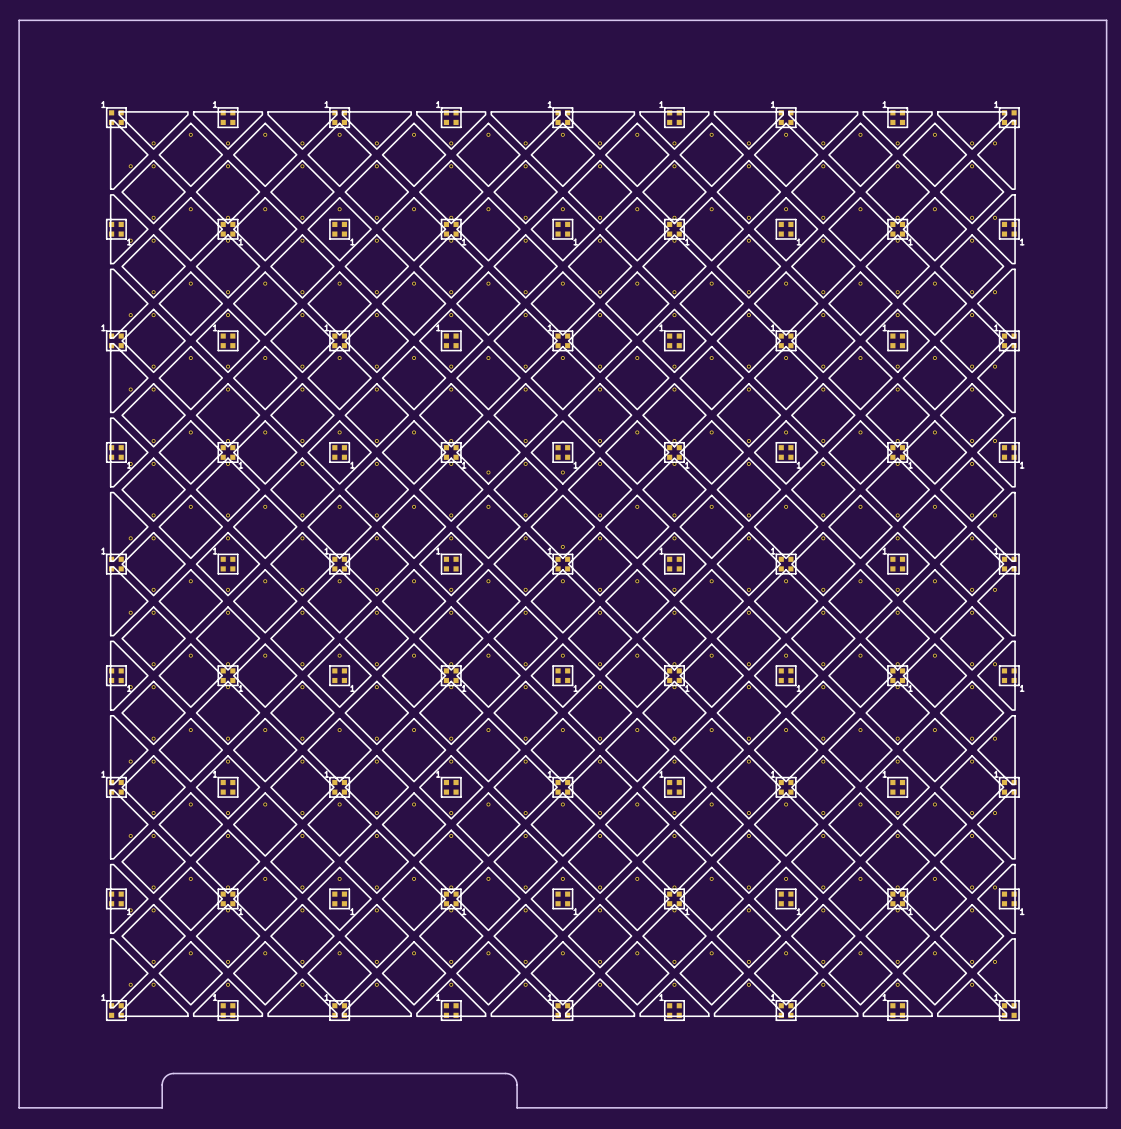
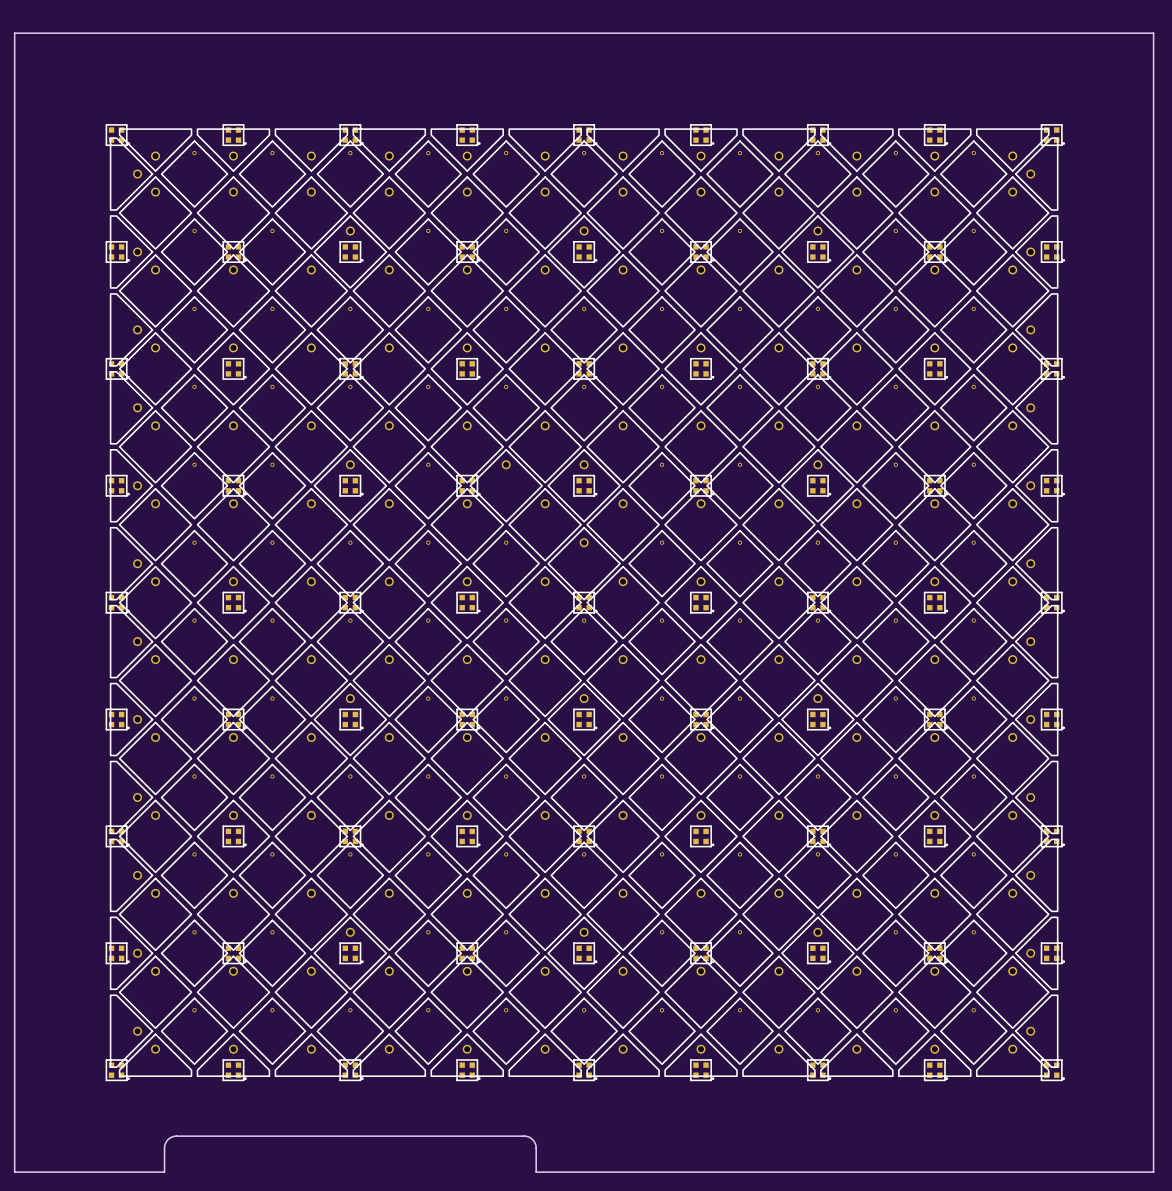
part footprint: [106, 107, 127, 128] -> [105, 124, 130, 146]
part footprint: [217, 107, 239, 128] -> [222, 124, 247, 146]
part footprint: [329, 107, 350, 128] -> [339, 124, 364, 146]
part footprint: [440, 107, 462, 128] -> [456, 124, 481, 146]
part footprint: [552, 107, 574, 128] -> [573, 124, 598, 146]
part footprint: [664, 107, 685, 128] -> [690, 124, 715, 146]
part footprint: [775, 107, 797, 128] -> [807, 124, 832, 146]
part footprint: [887, 107, 909, 128] -> [924, 124, 948, 146]
part footprint: [999, 107, 1020, 128] -> [1040, 124, 1065, 146]
part footprint: [118, 111, 189, 1017] -> [119, 566, 192, 639]
part footprint: [267, 111, 338, 1017] -> [275, 566, 348, 639]
part footprint: [342, 111, 412, 1017] -> [353, 566, 426, 639]
part footprint: [491, 111, 561, 1017] -> [508, 566, 582, 639]
part footprint: [565, 111, 635, 1017] -> [586, 566, 660, 639]
part footprint: [714, 111, 784, 1017] -> [742, 566, 816, 639]
part footprint: [788, 111, 858, 1017] -> [820, 566, 894, 639]
part footprint: [937, 111, 1007, 1017] -> [976, 566, 1049, 639]
part footprint: [110, 120, 149, 190] -> [109, 137, 154, 211]
part footprint: [977, 120, 1016, 190] -> [1015, 137, 1059, 211]
part: none -> (155, 150)
part: none -> (233, 150)
part: none -> (311, 150)
part: none -> (389, 150)
part: none -> (467, 150)
part: none -> (545, 150)
part: none -> (623, 150)
part: none -> (701, 150)
part: none -> (778, 150)
part: none -> (856, 150)
part: none -> (934, 150)
part: none -> (1012, 150)
part: none -> (155, 213)
part: none -> (233, 213)
part: none -> (311, 213)
part: none -> (389, 213)
part: none -> (467, 213)
part: none -> (545, 213)
part: none -> (623, 213)
part: none -> (701, 213)
part: none -> (778, 213)
part: none -> (856, 213)
part: none -> (934, 213)
part: none -> (1012, 213)
part footprint: [110, 194, 149, 264] -> [109, 215, 154, 289]
part footprint: [977, 194, 1016, 264] -> [1015, 215, 1059, 289]
part footprint: [106, 218, 127, 240] -> [105, 241, 130, 263]
part footprint: [217, 218, 239, 240] -> [222, 241, 247, 263]
part footprint: [440, 218, 462, 240] -> [456, 241, 481, 263]
part footprint: [664, 218, 685, 240] -> [690, 241, 715, 263]
part footprint: [887, 218, 909, 240] -> [924, 241, 948, 263]
part footprint: [999, 218, 1020, 240] -> [1040, 241, 1065, 263]
part: (339, 229) -> none
part: (339, 229) -> none
part: none -> (350, 251)
part: none -> (351, 251)
part: (562, 229) -> none
part: (562, 229) -> none
part: none -> (584, 251)
part: none -> (585, 251)
part: (786, 229) -> none
part: (786, 229) -> none
part: none -> (817, 251)
part: none -> (819, 251)
part: none -> (155, 290)
part: none -> (233, 290)
part: none -> (311, 290)
part: none -> (389, 290)
part: none -> (467, 290)
part: none -> (545, 290)
part: none -> (623, 290)
part: none -> (701, 290)
part: none -> (778, 290)
part: none -> (856, 290)
part: none -> (934, 290)
part: none -> (1012, 290)
part footprint: [110, 269, 149, 339] -> [109, 293, 154, 367]
part footprint: [977, 269, 1016, 339] -> [1015, 293, 1059, 367]
part footprint: [106, 330, 127, 352] -> [105, 358, 130, 380]
part footprint: [217, 330, 239, 352] -> [197, 332, 270, 406]
part footprint: [329, 330, 350, 352] -> [339, 358, 364, 380]
part footprint: [440, 330, 462, 352] -> [430, 332, 504, 406]
part footprint: [552, 330, 574, 352] -> [573, 358, 598, 380]
part footprint: [664, 330, 685, 352] -> [664, 332, 738, 406]
part footprint: [775, 330, 797, 352] -> [807, 358, 832, 380]
part footprint: [887, 330, 909, 352] -> [898, 332, 972, 406]
part footprint: [999, 330, 1020, 352] -> [1040, 358, 1065, 380]
part: none -> (155, 368)
part: none -> (234, 368)
part: none -> (311, 368)
part: none -> (389, 368)
part: none -> (468, 368)
part: none -> (545, 368)
part: none -> (623, 368)
part: none -> (702, 368)
part: none -> (778, 368)
part: none -> (856, 368)
part: none -> (936, 368)
part: none -> (1012, 368)
part footprint: [110, 343, 149, 413] -> [109, 371, 154, 445]
part footprint: [977, 343, 1016, 413] -> [1015, 371, 1059, 445]
part: none -> (155, 446)
part: none -> (233, 446)
part: none -> (311, 446)
part: none -> (389, 446)
part: none -> (467, 446)
part: none -> (545, 446)
part: none -> (623, 446)
part: none -> (701, 446)
part: none -> (778, 446)
part: none -> (856, 446)
part: none -> (934, 446)
part: none -> (1012, 446)
part footprint: [110, 417, 149, 488] -> [109, 449, 154, 523]
part footprint: [977, 417, 1016, 488] -> [1015, 449, 1059, 523]
part footprint: [456, 420, 521, 485] -> [469, 449, 543, 523]
part footprint: [106, 442, 127, 463] -> [105, 474, 130, 497]
part footprint: [217, 442, 239, 463] -> [222, 474, 247, 497]
part footprint: [440, 442, 462, 463] -> [456, 474, 481, 497]
part footprint: [664, 442, 685, 463] -> [690, 474, 715, 497]
part footprint: [887, 442, 909, 463] -> [924, 474, 948, 497]
part footprint: [999, 442, 1020, 463] -> [1040, 474, 1065, 497]
part: (339, 452) -> none
part: (339, 452) -> none
part: none -> (350, 485)
part: none -> (351, 485)
part: (562, 452) -> none
part: (562, 452) -> none
part: none -> (584, 485)
part: none -> (585, 485)
part: (786, 452) -> none
part: (786, 452) -> none
part: none -> (817, 485)
part: none -> (819, 485)
part: none -> (155, 524)
part: none -> (233, 524)
part: none -> (311, 524)
part: none -> (389, 524)
part: none -> (467, 524)
part: none -> (545, 524)
part: none -> (623, 524)
part: none -> (701, 524)
part: none -> (778, 524)
part: none -> (856, 524)
part: none -> (934, 524)
part: none -> (1012, 524)
part footprint: [110, 492, 149, 562] -> [109, 527, 154, 601]
part footprint: [977, 492, 1016, 562] -> [1015, 527, 1059, 601]
part footprint: [531, 495, 595, 559] -> [547, 527, 621, 600]
part footprint: [106, 553, 127, 575] -> [105, 591, 130, 614]
part footprint: [329, 553, 350, 575] -> [339, 591, 364, 614]
part footprint: [552, 553, 574, 575] -> [573, 591, 598, 614]
part footprint: [775, 553, 797, 575] -> [807, 591, 832, 614]
part footprint: [999, 553, 1020, 575] -> [1040, 591, 1065, 614]
part: (228, 564) -> none
part: (228, 564) -> none
part: none -> (233, 602)
part: none -> (234, 602)
part: (451, 564) -> none
part: (451, 564) -> none
part: none -> (467, 602)
part: none -> (468, 602)
part: (674, 564) -> none
part: (674, 564) -> none
part: none -> (701, 602)
part: none -> (702, 602)
part: (897, 564) -> none
part: (897, 564) -> none
part: none -> (934, 602)
part: none -> (936, 602)
part footprint: [110, 566, 149, 636] -> [109, 605, 154, 679]
part footprint: [977, 566, 1016, 636] -> [1015, 605, 1059, 679]
part: none -> (155, 680)
part: none -> (233, 680)
part: none -> (311, 680)
part: none -> (389, 680)
part: none -> (467, 680)
part: none -> (545, 680)
part: none -> (623, 680)
part: none -> (701, 680)
part: none -> (778, 680)
part: none -> (856, 680)
part: none -> (934, 680)
part: none -> (1012, 680)
part footprint: [110, 641, 149, 711] -> [109, 682, 154, 757]
part footprint: [977, 641, 1016, 711] -> [1015, 682, 1059, 757]
part footprint: [106, 665, 127, 687] -> [105, 708, 130, 731]
part footprint: [217, 665, 239, 687] -> [222, 708, 247, 731]
part footprint: [440, 665, 462, 687] -> [456, 708, 481, 731]
part footprint: [664, 665, 685, 687] -> [690, 708, 715, 731]
part footprint: [887, 665, 909, 687] -> [924, 708, 948, 731]
part footprint: [999, 665, 1020, 687] -> [1040, 708, 1065, 731]
part: (339, 675) -> none
part: (339, 675) -> none
part: none -> (350, 719)
part: none -> (351, 719)
part: (562, 675) -> none
part: (562, 675) -> none
part: none -> (584, 719)
part: none -> (585, 719)
part: (786, 675) -> none
part: (786, 675) -> none
part: none -> (817, 719)
part: none -> (819, 719)
part: none -> (155, 758)
part: none -> (233, 758)
part: none -> (311, 758)
part: none -> (389, 758)
part: none -> (467, 758)
part: none -> (545, 758)
part: none -> (623, 758)
part: none -> (701, 758)
part: none -> (778, 758)
part: none -> (856, 758)
part: none -> (934, 758)
part: none -> (1012, 758)
part footprint: [110, 715, 149, 785] -> [109, 760, 154, 835]
part footprint: [977, 715, 1016, 785] -> [1015, 760, 1059, 835]
part footprint: [106, 777, 127, 798] -> [105, 825, 130, 848]
part footprint: [217, 777, 239, 798] -> [197, 800, 270, 873]
part footprint: [329, 777, 350, 798] -> [339, 825, 364, 848]
part footprint: [440, 777, 462, 798] -> [430, 800, 504, 873]
part footprint: [552, 777, 574, 798] -> [573, 825, 598, 848]
part footprint: [664, 777, 685, 798] -> [664, 800, 738, 873]
part footprint: [775, 777, 797, 798] -> [807, 825, 832, 848]
part footprint: [887, 777, 909, 798] -> [898, 800, 972, 873]
part footprint: [999, 777, 1020, 798] -> [1040, 825, 1065, 848]
part: none -> (155, 836)
part: none -> (234, 836)
part: none -> (311, 836)
part: none -> (389, 836)
part: none -> (468, 836)
part: none -> (545, 836)
part: none -> (623, 836)
part: none -> (702, 836)
part: none -> (778, 836)
part: none -> (856, 836)
part: none -> (936, 836)
part: none -> (1012, 836)
part footprint: [110, 789, 149, 860] -> [109, 838, 154, 912]
part footprint: [977, 789, 1016, 860] -> [1015, 838, 1059, 912]
part: none -> (155, 914)
part: none -> (233, 914)
part: none -> (311, 914)
part: none -> (389, 914)
part: none -> (467, 914)
part: none -> (545, 914)
part: none -> (623, 914)
part: none -> (701, 914)
part: none -> (778, 914)
part: none -> (856, 914)
part: none -> (934, 914)
part: none -> (1012, 914)
part footprint: [110, 864, 149, 934] -> [109, 916, 154, 990]
part footprint: [977, 864, 1016, 934] -> [1015, 916, 1059, 990]
part footprint: [106, 888, 127, 910] -> [105, 942, 130, 965]
part footprint: [217, 888, 239, 910] -> [222, 942, 247, 965]
part footprint: [440, 888, 462, 910] -> [456, 942, 481, 965]
part footprint: [664, 888, 685, 910] -> [690, 942, 715, 965]
part footprint: [887, 888, 909, 910] -> [924, 942, 948, 965]
part footprint: [999, 888, 1020, 910] -> [1040, 942, 1065, 965]
part: (339, 898) -> none
part: (339, 898) -> none
part: none -> (350, 953)
part: none -> (351, 953)
part: (562, 898) -> none
part: (562, 898) -> none
part: none -> (584, 953)
part: none -> (585, 953)
part: (786, 898) -> none
part: (786, 898) -> none
part: none -> (817, 953)
part: none -> (819, 953)
part: none -> (155, 992)
part: none -> (233, 992)
part: none -> (311, 992)
part: none -> (389, 992)
part: none -> (467, 992)
part: none -> (545, 992)
part: none -> (623, 992)
part: none -> (701, 992)
part: none -> (778, 992)
part: none -> (856, 992)
part: none -> (934, 992)
part: none -> (1012, 992)
part footprint: [110, 938, 149, 1008] -> [109, 994, 154, 1068]
part footprint: [977, 938, 1016, 1008] -> [1015, 994, 1059, 1068]
part: none -> (155, 1055)
part: none -> (233, 1055)
part: none -> (311, 1055)
part: none -> (389, 1055)
part: none -> (467, 1055)
part: none -> (545, 1055)
part: none -> (623, 1055)
part: none -> (701, 1055)
part: none -> (778, 1055)
part: none -> (856, 1055)
part: none -> (934, 1055)
part: none -> (1012, 1055)
part footprint: [106, 1000, 127, 1021] -> [105, 1059, 130, 1081]
part footprint: [217, 1000, 239, 1021] -> [222, 1059, 247, 1081]
part footprint: [329, 1000, 350, 1021] -> [339, 1059, 364, 1081]
part footprint: [440, 1000, 462, 1021] -> [456, 1059, 481, 1081]
part footprint: [552, 1000, 574, 1021] -> [573, 1059, 598, 1081]
part footprint: [664, 1000, 685, 1021] -> [690, 1059, 715, 1081]
part footprint: [775, 1000, 797, 1021] -> [807, 1059, 832, 1081]
part footprint: [887, 1000, 909, 1021] -> [924, 1059, 948, 1081]
part footprint: [999, 1000, 1020, 1021] -> [1040, 1059, 1065, 1081]

